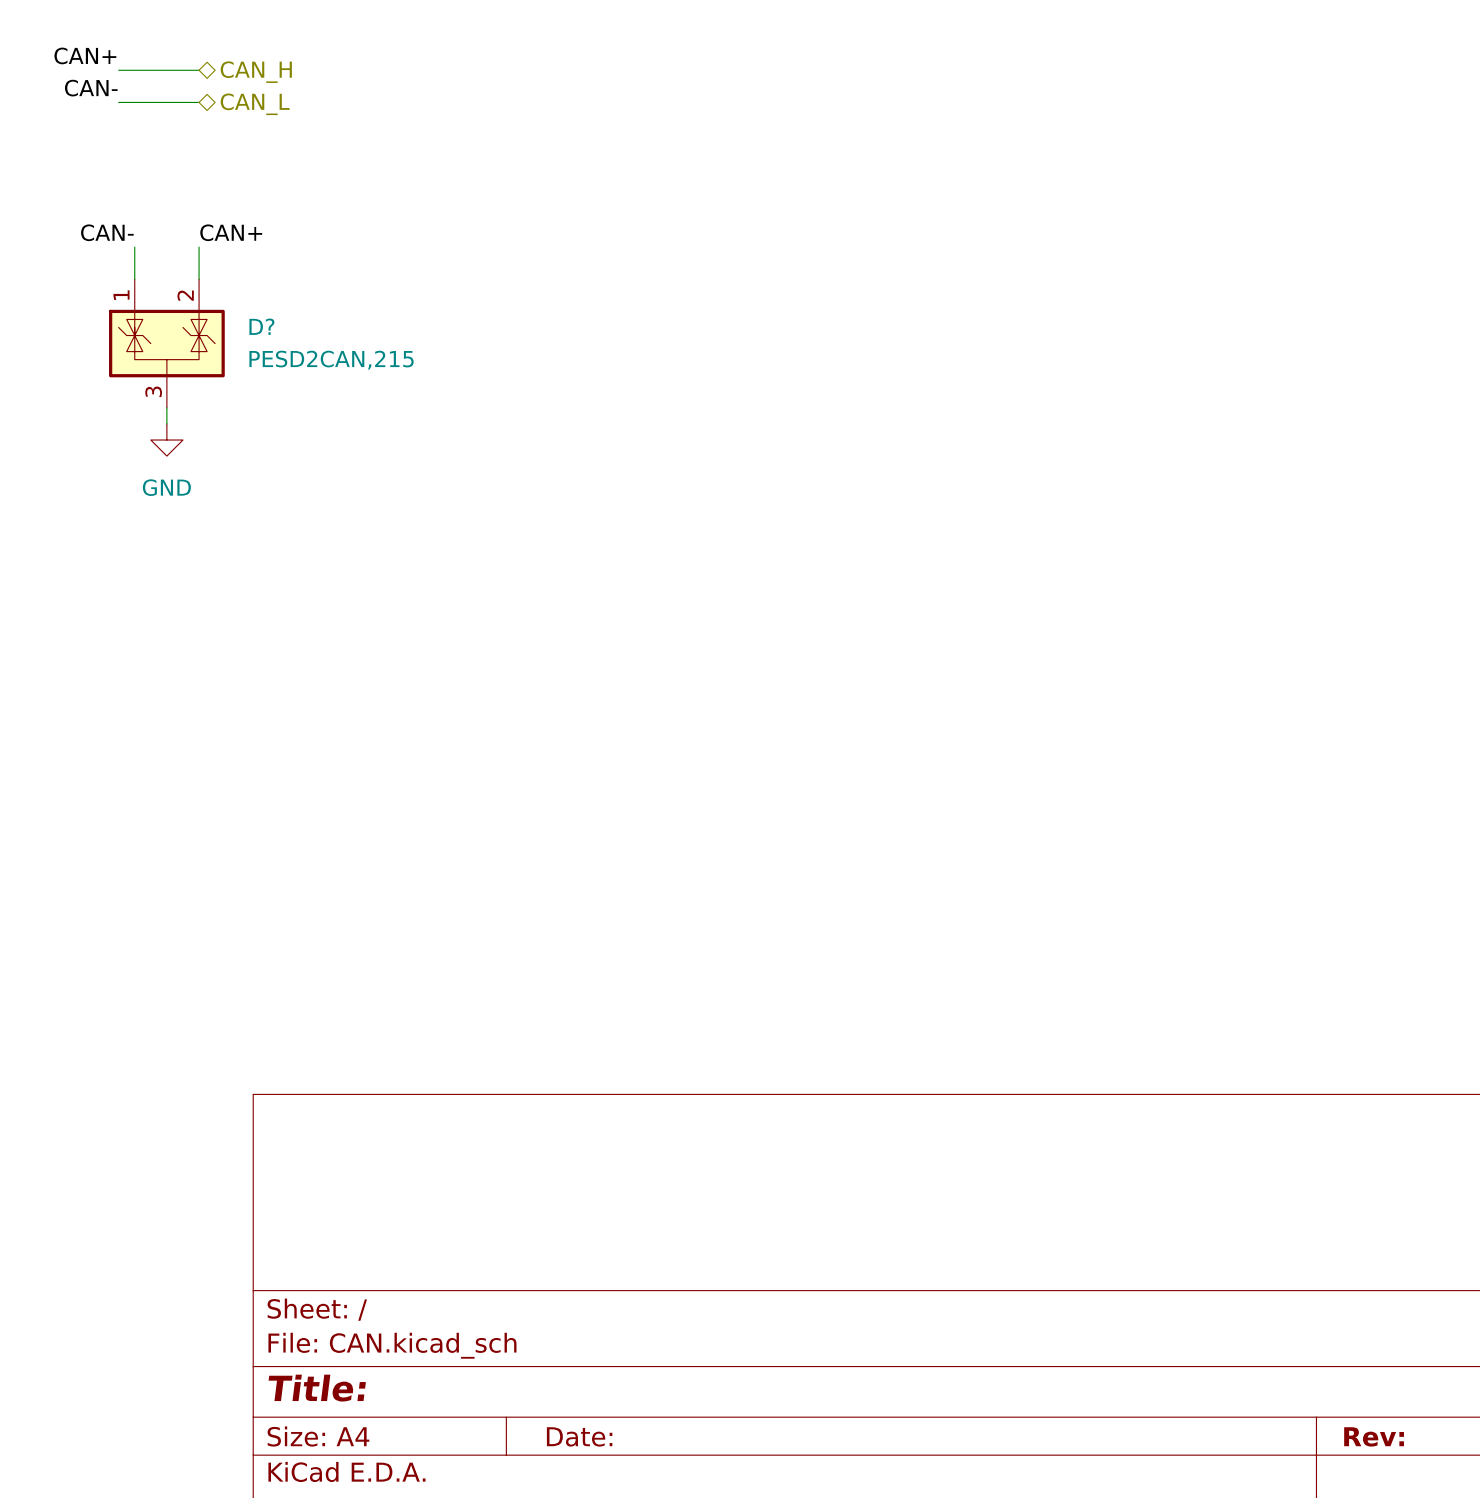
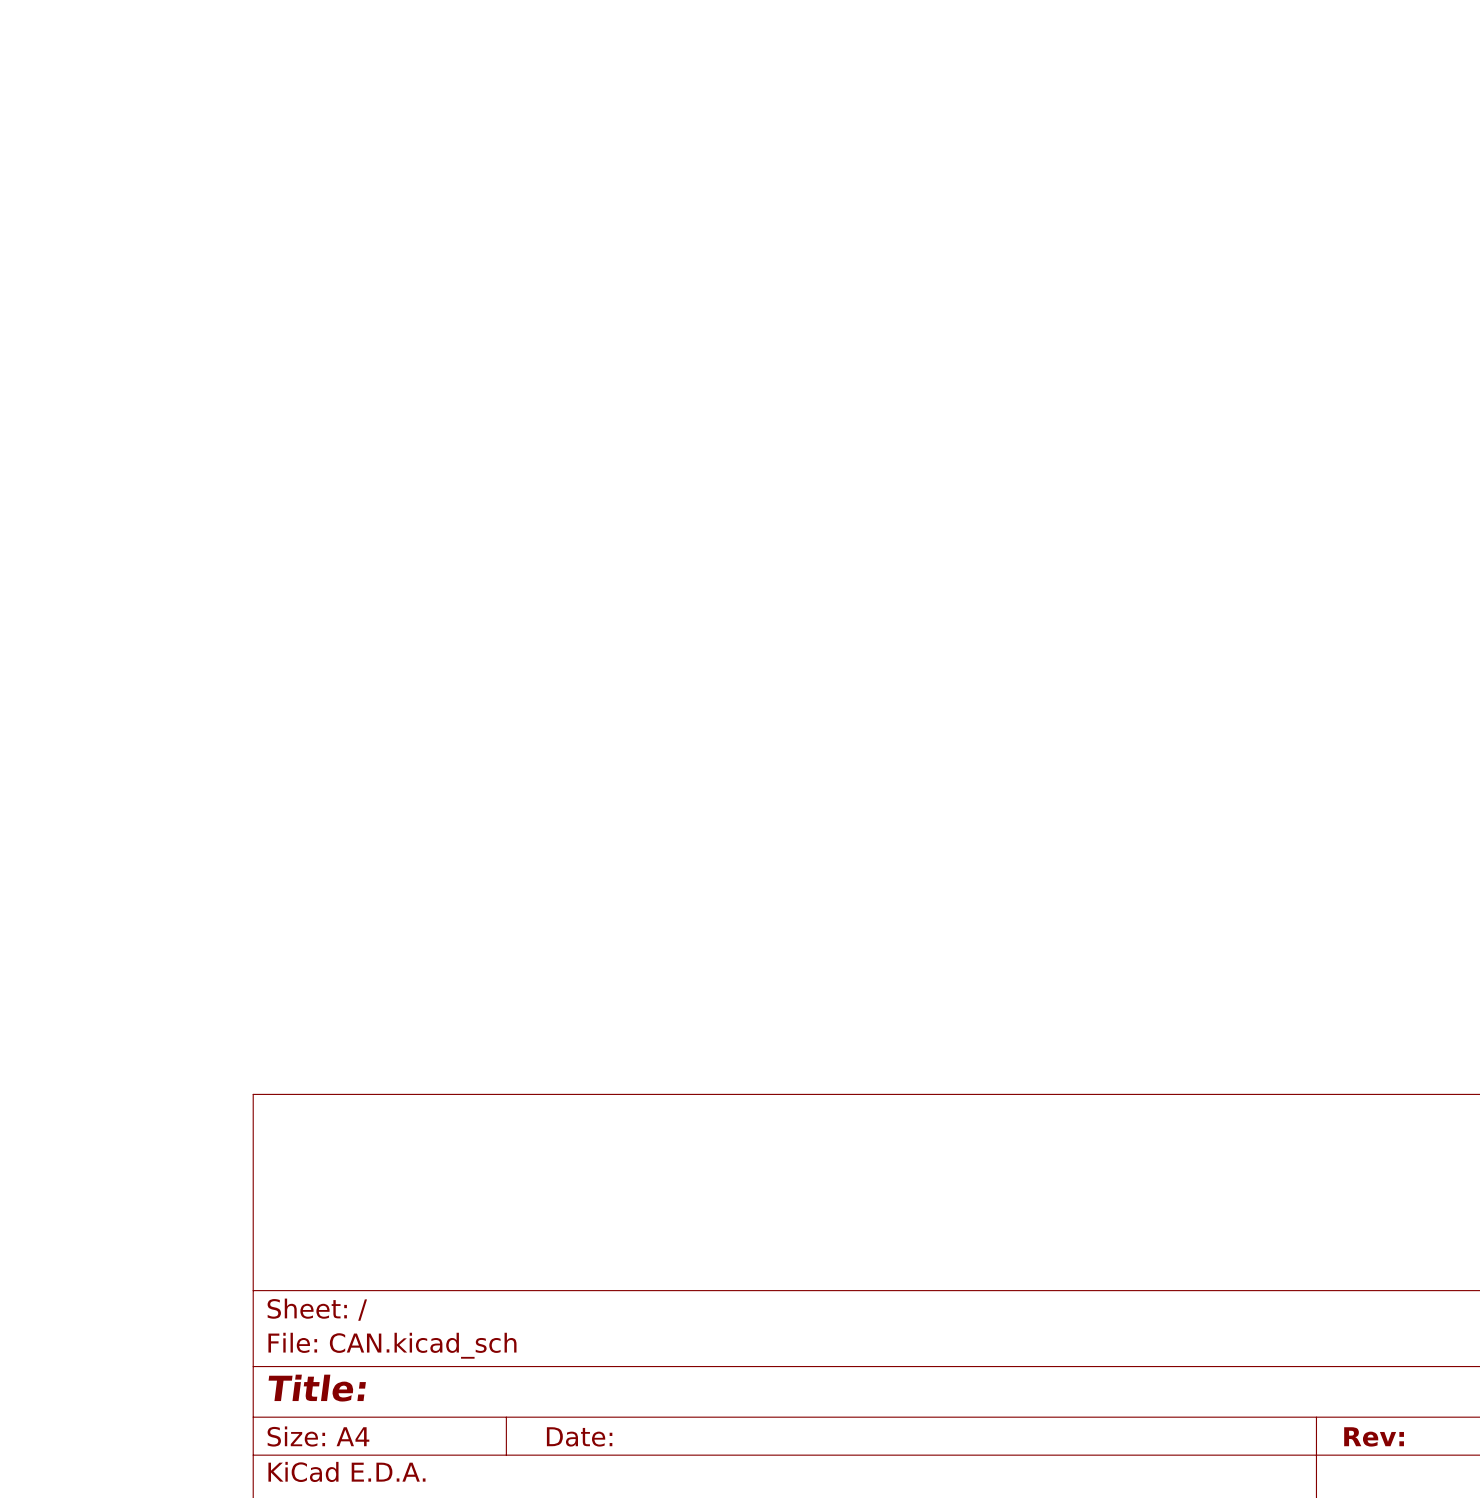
label: CAN+ (85, 55) -> none
wire: (118, 70) (199, 70) -> none
hierarchical label: CAN_H (256, 72) -> none
label: CAN- (91, 88) -> none
wire: (118, 102) (199, 102) -> none
hierarchical label: CAN_L (255, 104) -> none
label: CAN- (107, 232) -> none
label: CAN+ (231, 232) -> none
wire: (134, 247) (134, 279) -> none
wire: (199, 247) (199, 279) -> none
D?: PESD2CAN,215 (166, 343) -> none
wire: (166, 407) (166, 423) -> none
power symbol: GND (166, 440) -> none

